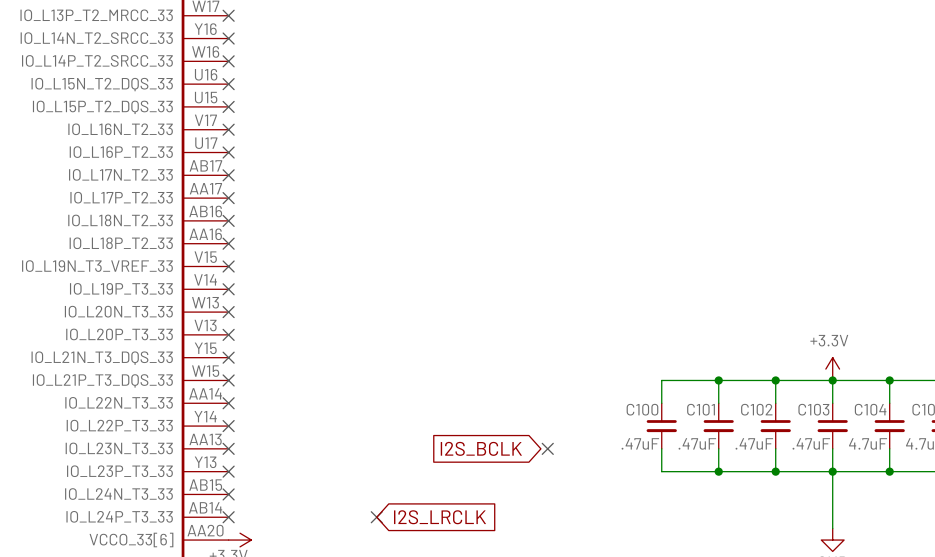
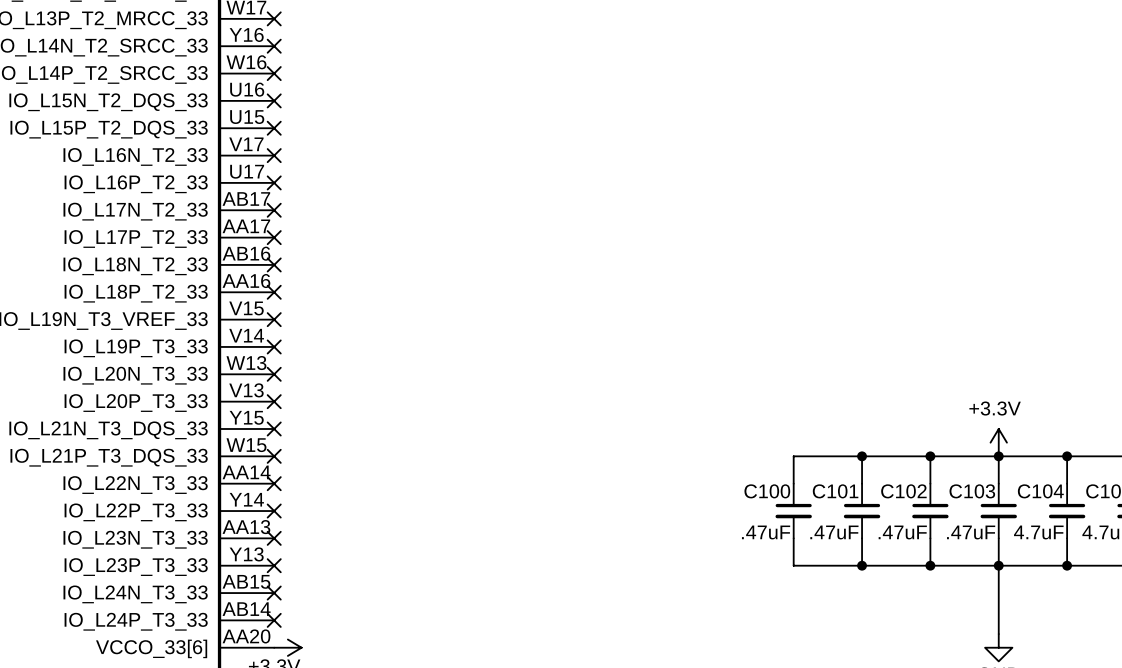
global label: I2S_BCLK (481, 448) -> none
no-connect mark: (547, 448) -> none
no-connect mark: (376, 517) -> none
global label: I2S_LRCLK (440, 517) -> none

